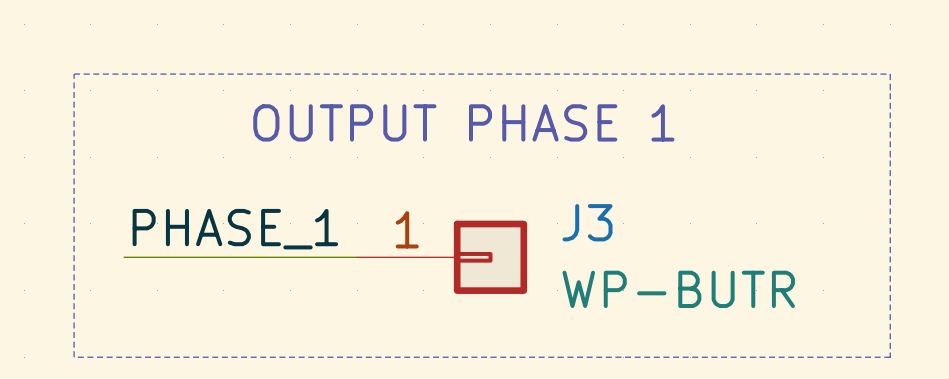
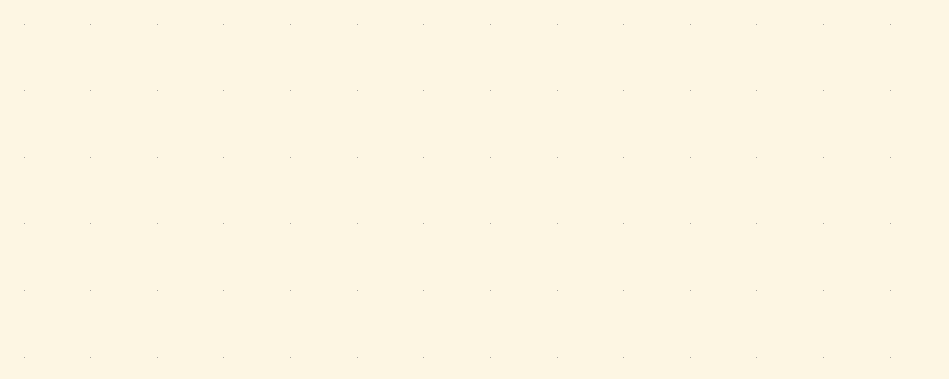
line: (74, 74) (890, 74) (890, 357) (74, 357) (74, 74) -> none
text: OUTPUT PHASE 1 (463, 122) -> none
label: PHASE_1 (235, 229) -> none
wire: (124, 257) (357, 257) -> none
J3: WP-BUTR (442, 257) -> none

